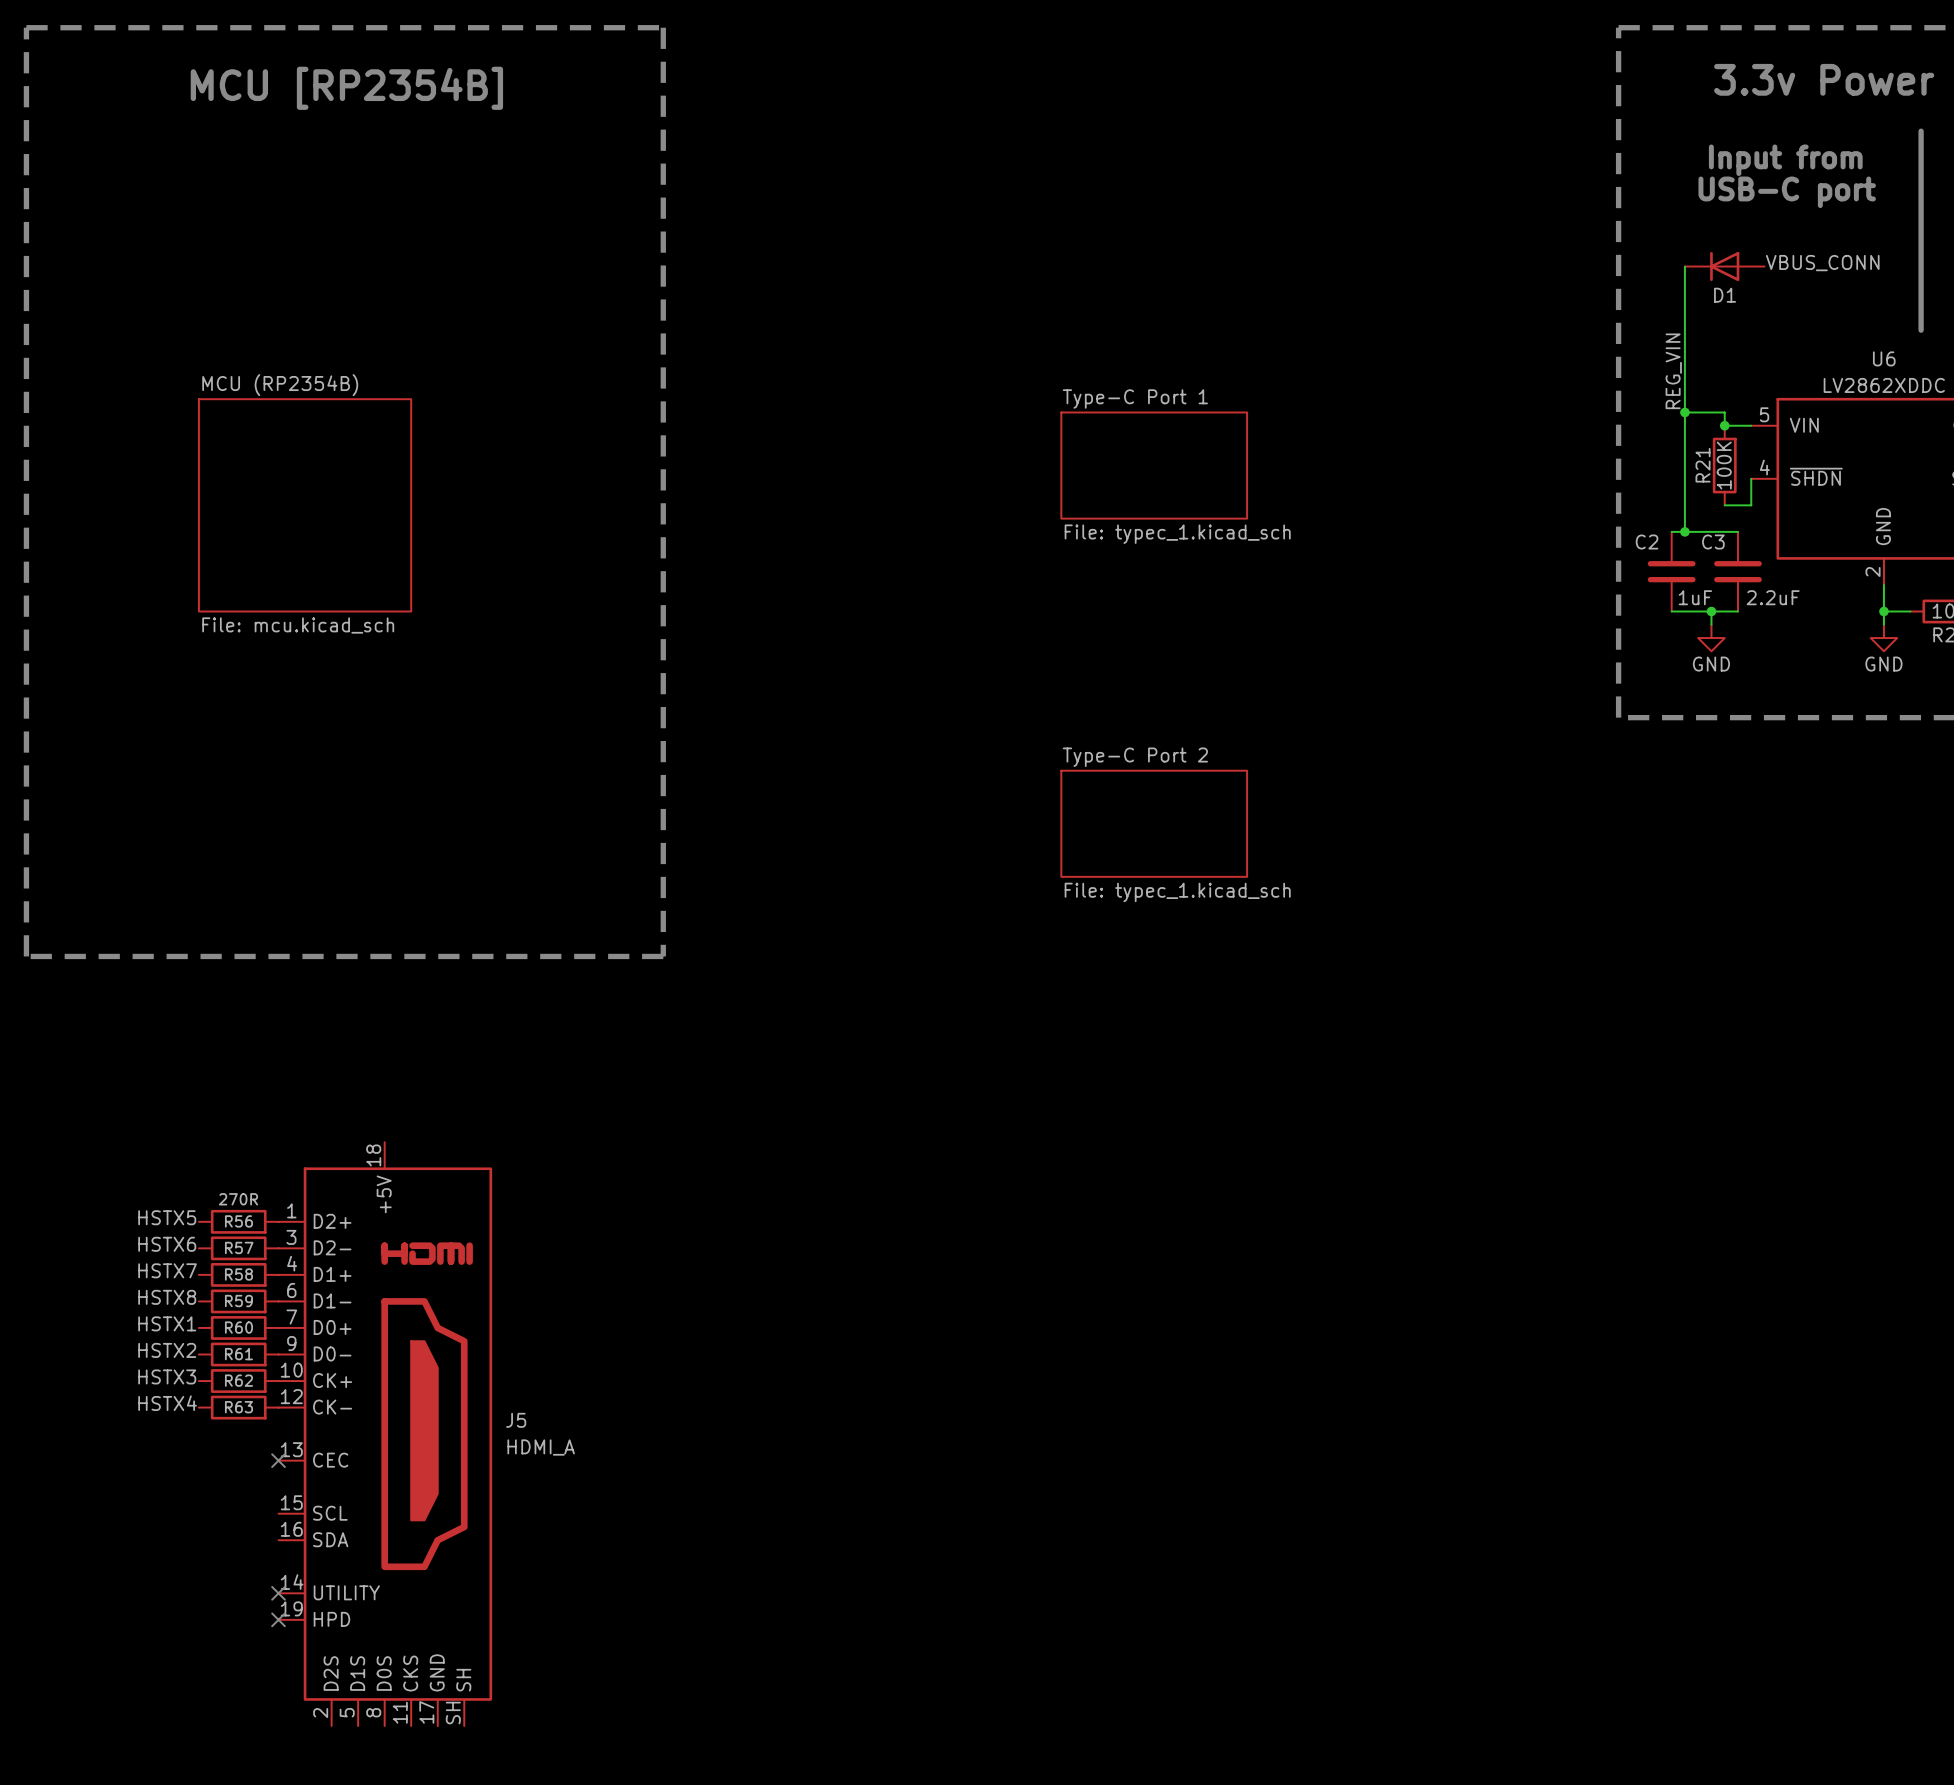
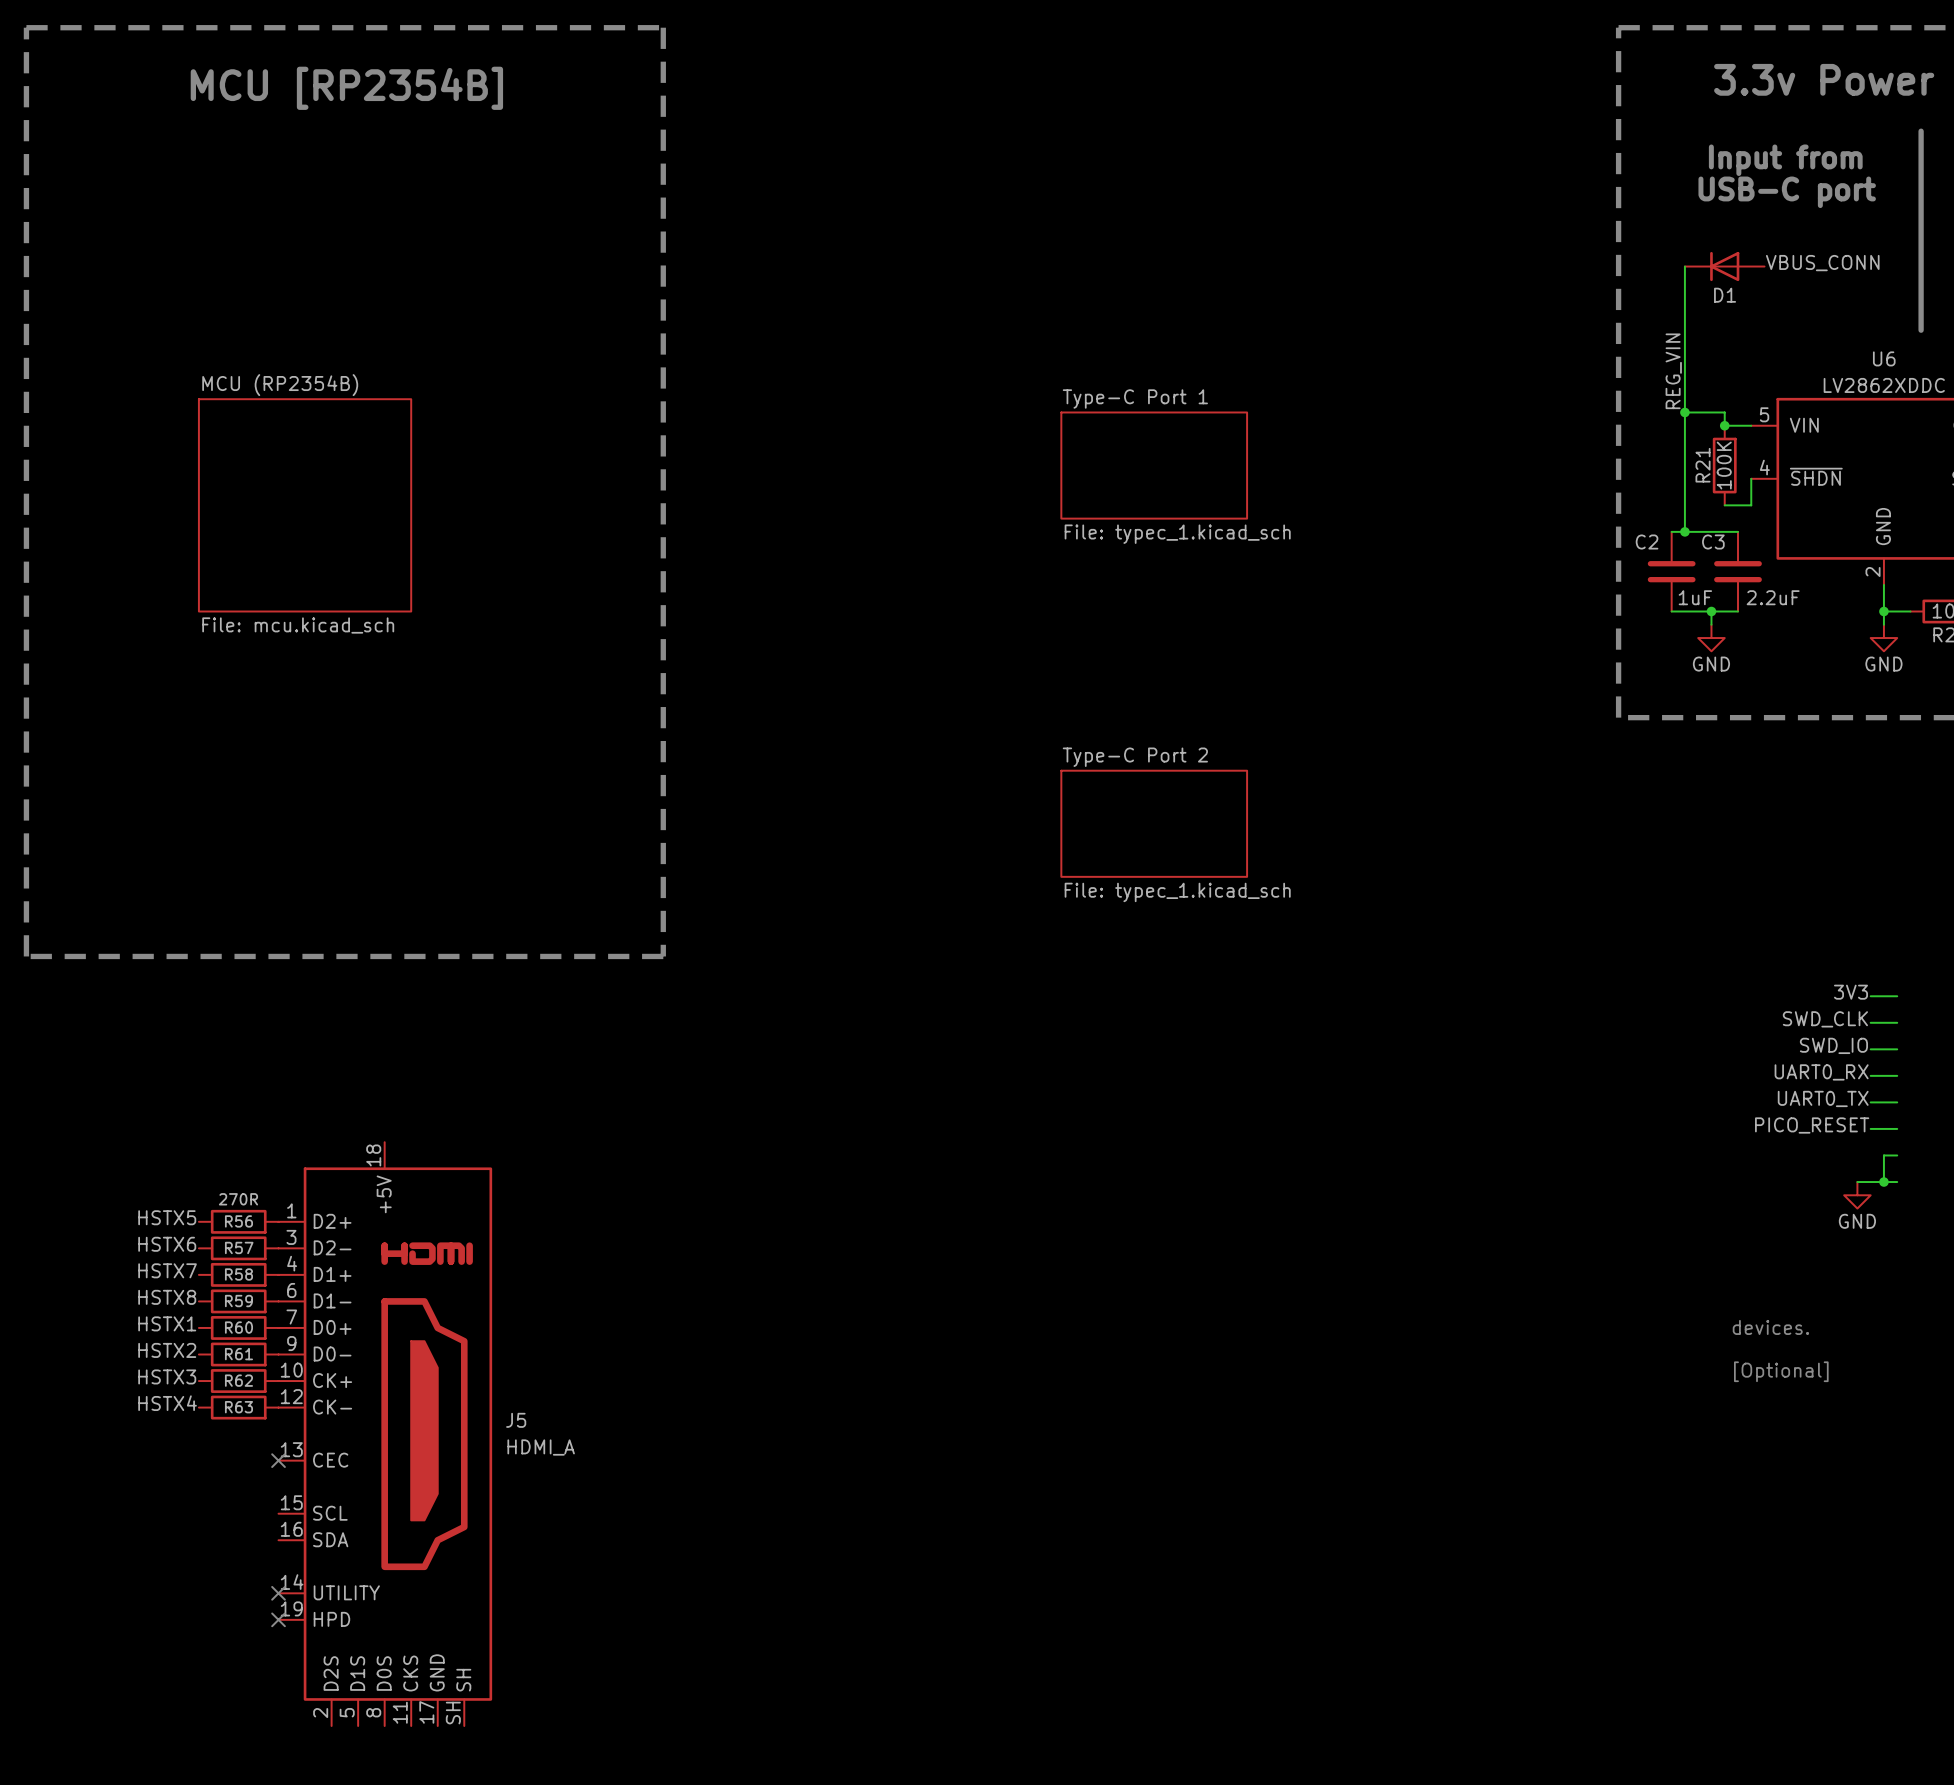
label: none -> 3V3 (1850, 992)
wire: none -> (1870, 996) (1897, 996)
label: none -> SWD_CLK (1825, 1019)
wire: none -> (1870, 1022) (1897, 1022)
label: none -> SWD_IO (1833, 1045)
wire: none -> (1870, 1049) (1897, 1049)
label: none -> UART0_RX (1821, 1072)
wire: none -> (1870, 1075) (1897, 1075)
label: none -> UART0_TX (1823, 1098)
wire: none -> (1870, 1102) (1897, 1102)
label: none -> PICO_RESET (1812, 1125)
wire: none -> (1870, 1128) (1897, 1128)
wire: none -> (1897, 1155) (1883, 1155) (1883, 1182)
wire: none -> (1857, 1182) (1897, 1182)
junction: none -> (1883, 1182)
power symbol: none -> GND (1857, 1195)
text: none -> devices. (1770, 1327)
text: none -> [Optional] (1781, 1371)

